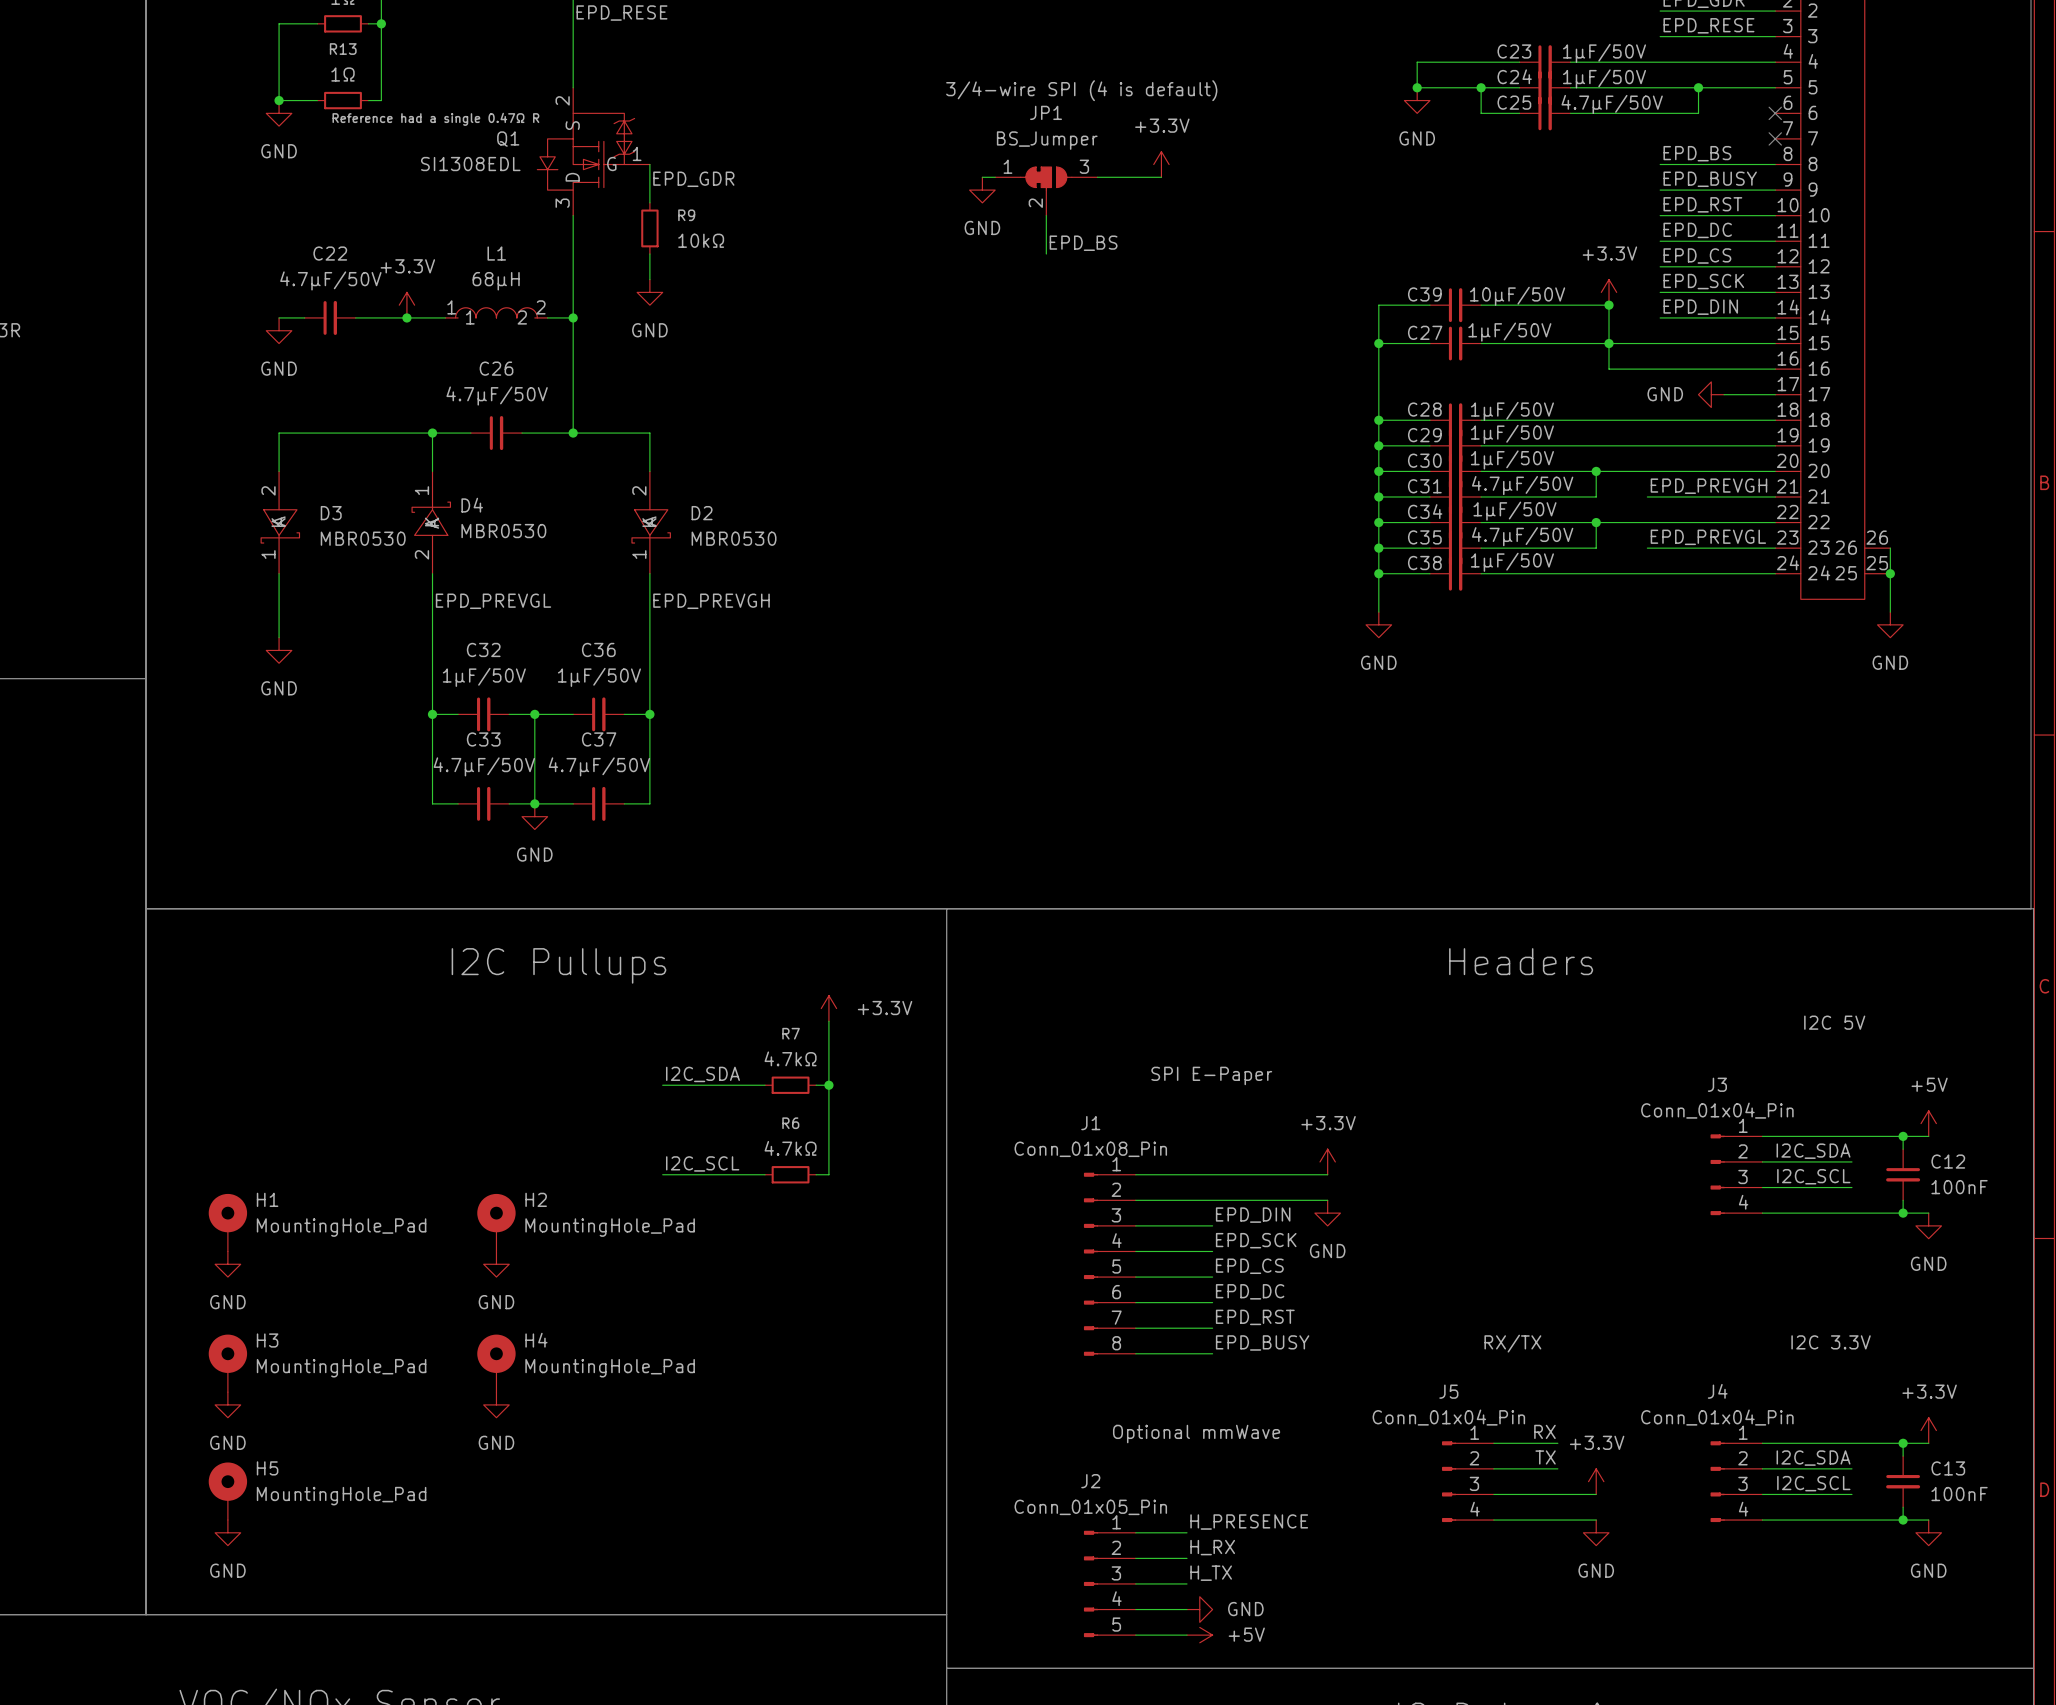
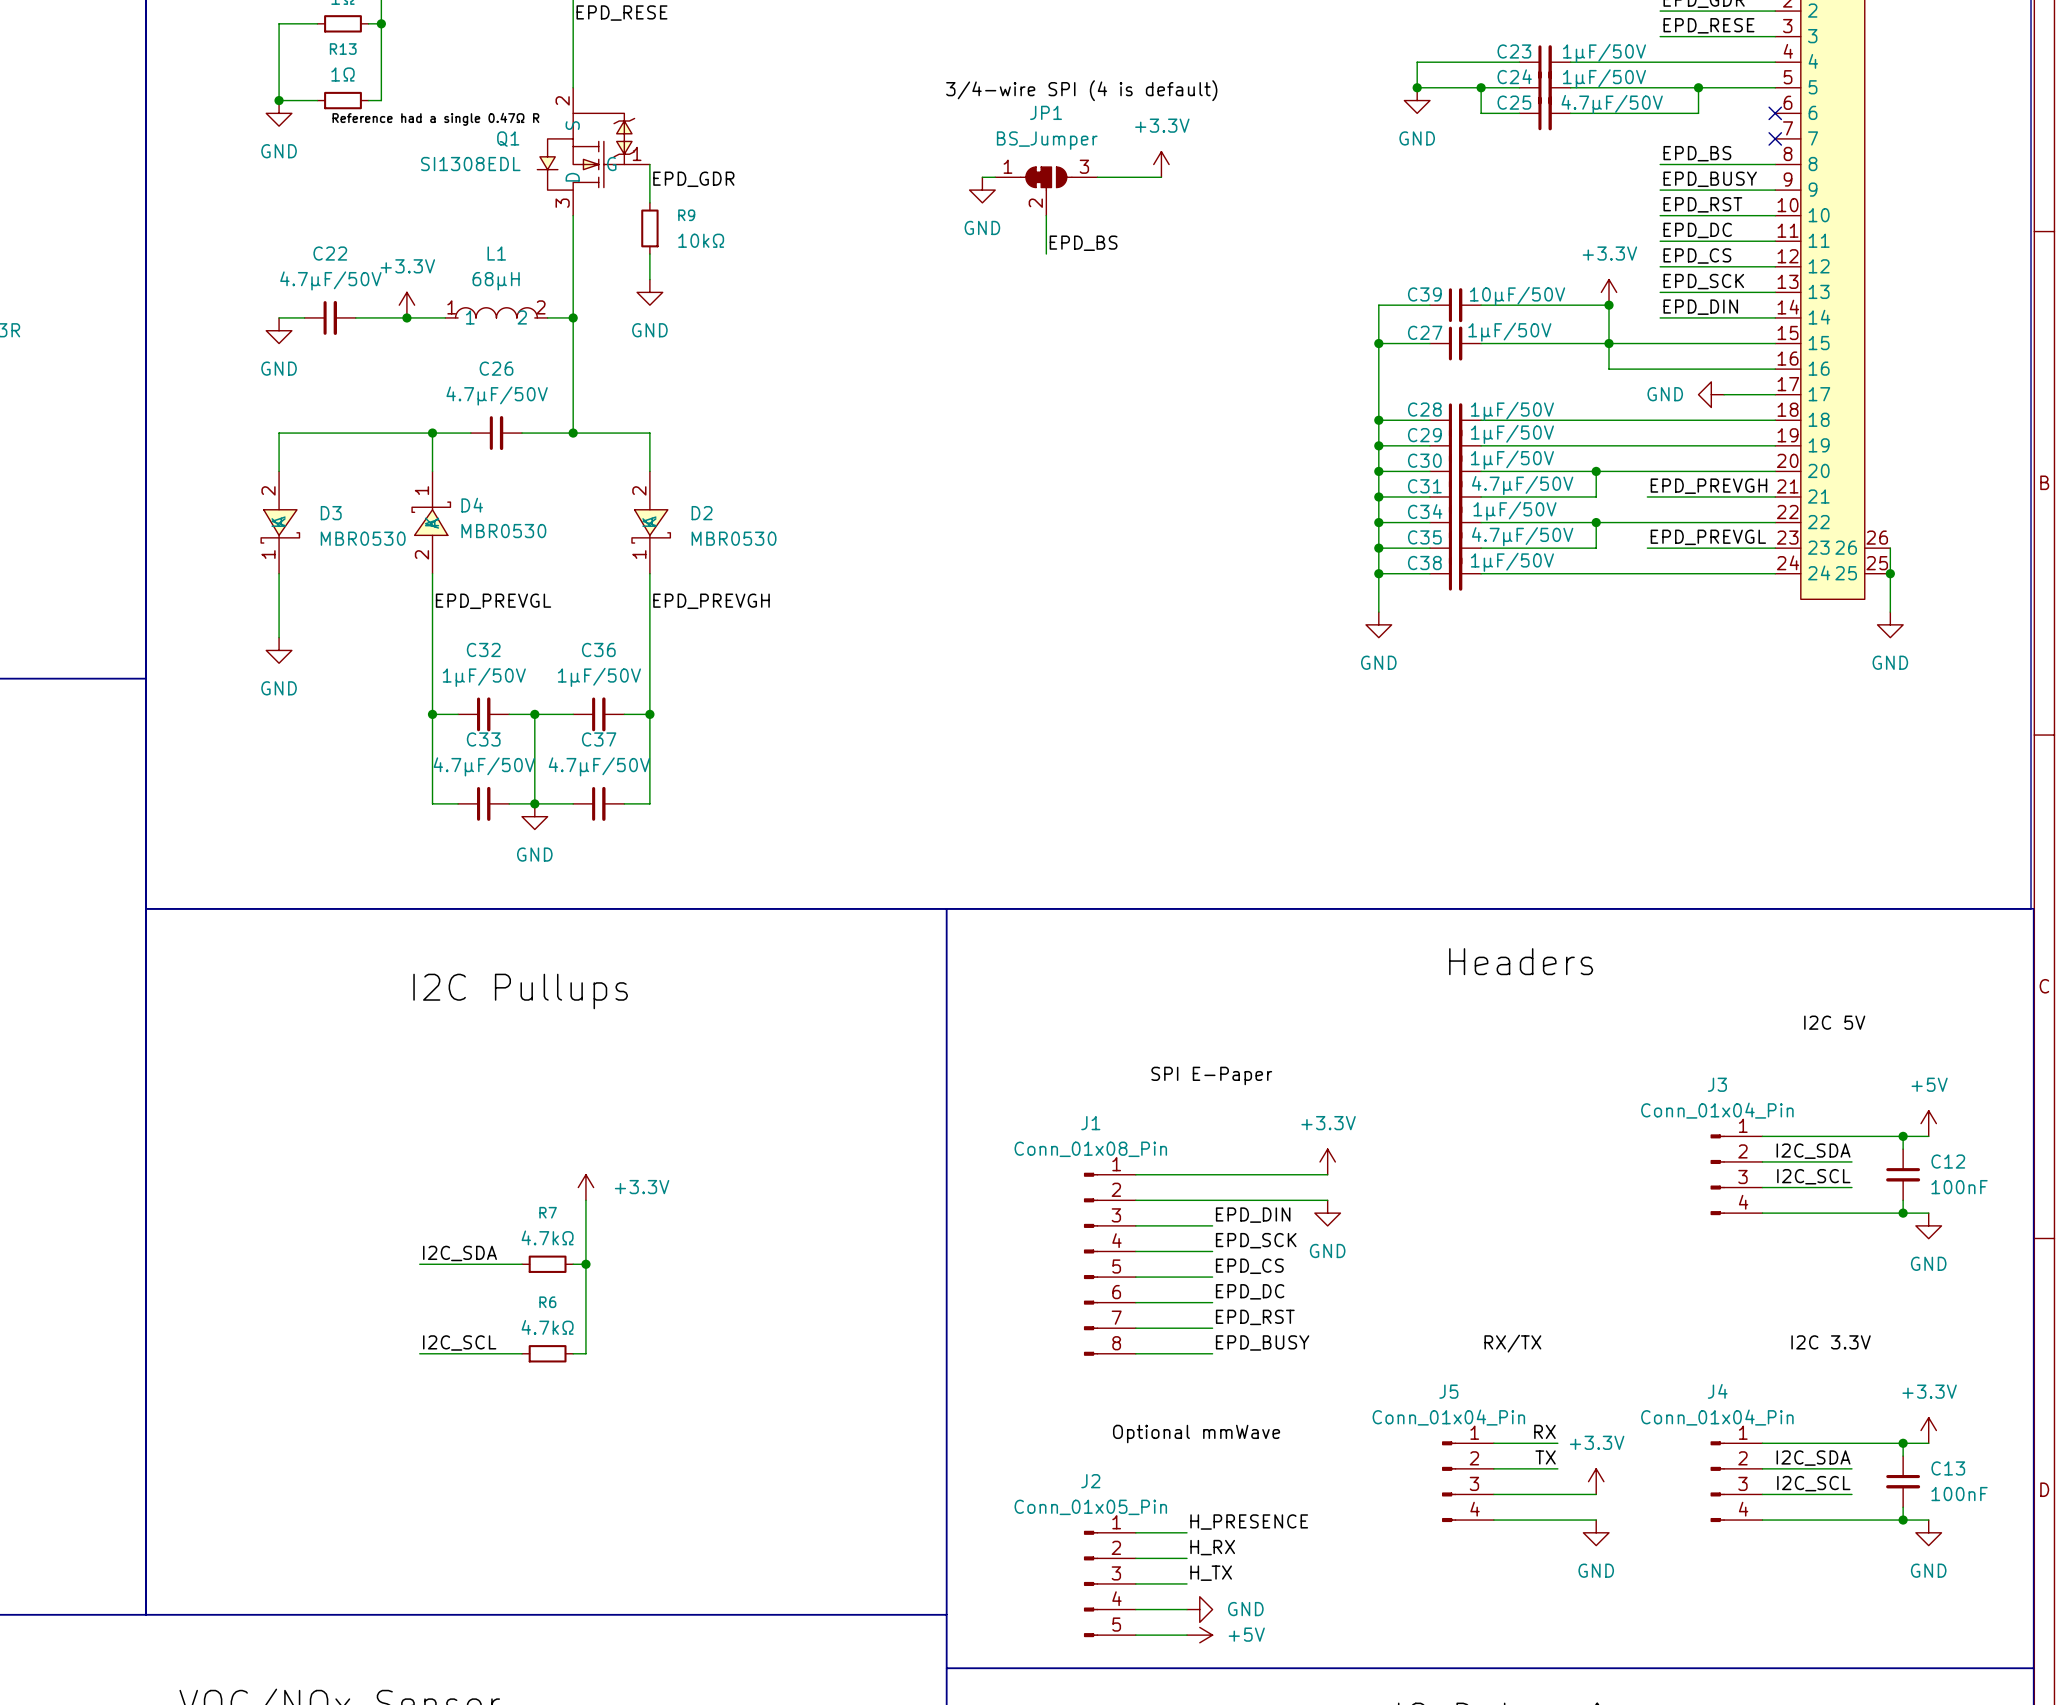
label position: I2C Pullups (558, 965) -> I2C Pullups (520, 991)
power symbol: +3.3V (828, 1008) -> none
wire: (828, 1021) (828, 1174) (816, 1174) -> none
label: I2C_SDA (702, 1074) -> none
wire: (662, 1085) (765, 1085) -> none
R7 position: (790, 1085) -> (547, 1264)
wire: (816, 1085) (828, 1085) -> none
junction: (828, 1085) -> none
label: I2C_SCL (702, 1163) -> none
wire: (662, 1174) (765, 1174) -> none
R6 position: (790, 1174) -> (547, 1353)
power symbol: none -> +3.3V (585, 1187)
wire: none -> (585, 1200) (585, 1353) (573, 1353)
H1: MountingHole_Pad (227, 1222) -> none
H2: MountingHole_Pad (496, 1222) -> none
label: none -> I2C_SDA (460, 1253)
power symbol: GND (227, 1264) -> none
wire: none -> (419, 1264) (522, 1264)
power symbol: GND (496, 1264) -> none
wire: none -> (573, 1264) (585, 1264)
junction: none -> (585, 1264)
label: none -> I2C_SCL (459, 1342)
wire: none -> (419, 1353) (522, 1353)
H3: MountingHole_Pad (227, 1363) -> none
H4: MountingHole_Pad (496, 1363) -> none
power symbol: GND (227, 1404) -> none
power symbol: GND (496, 1404) -> none
H5: MountingHole_Pad (227, 1491) -> none
power symbol: GND (227, 1532) -> none

